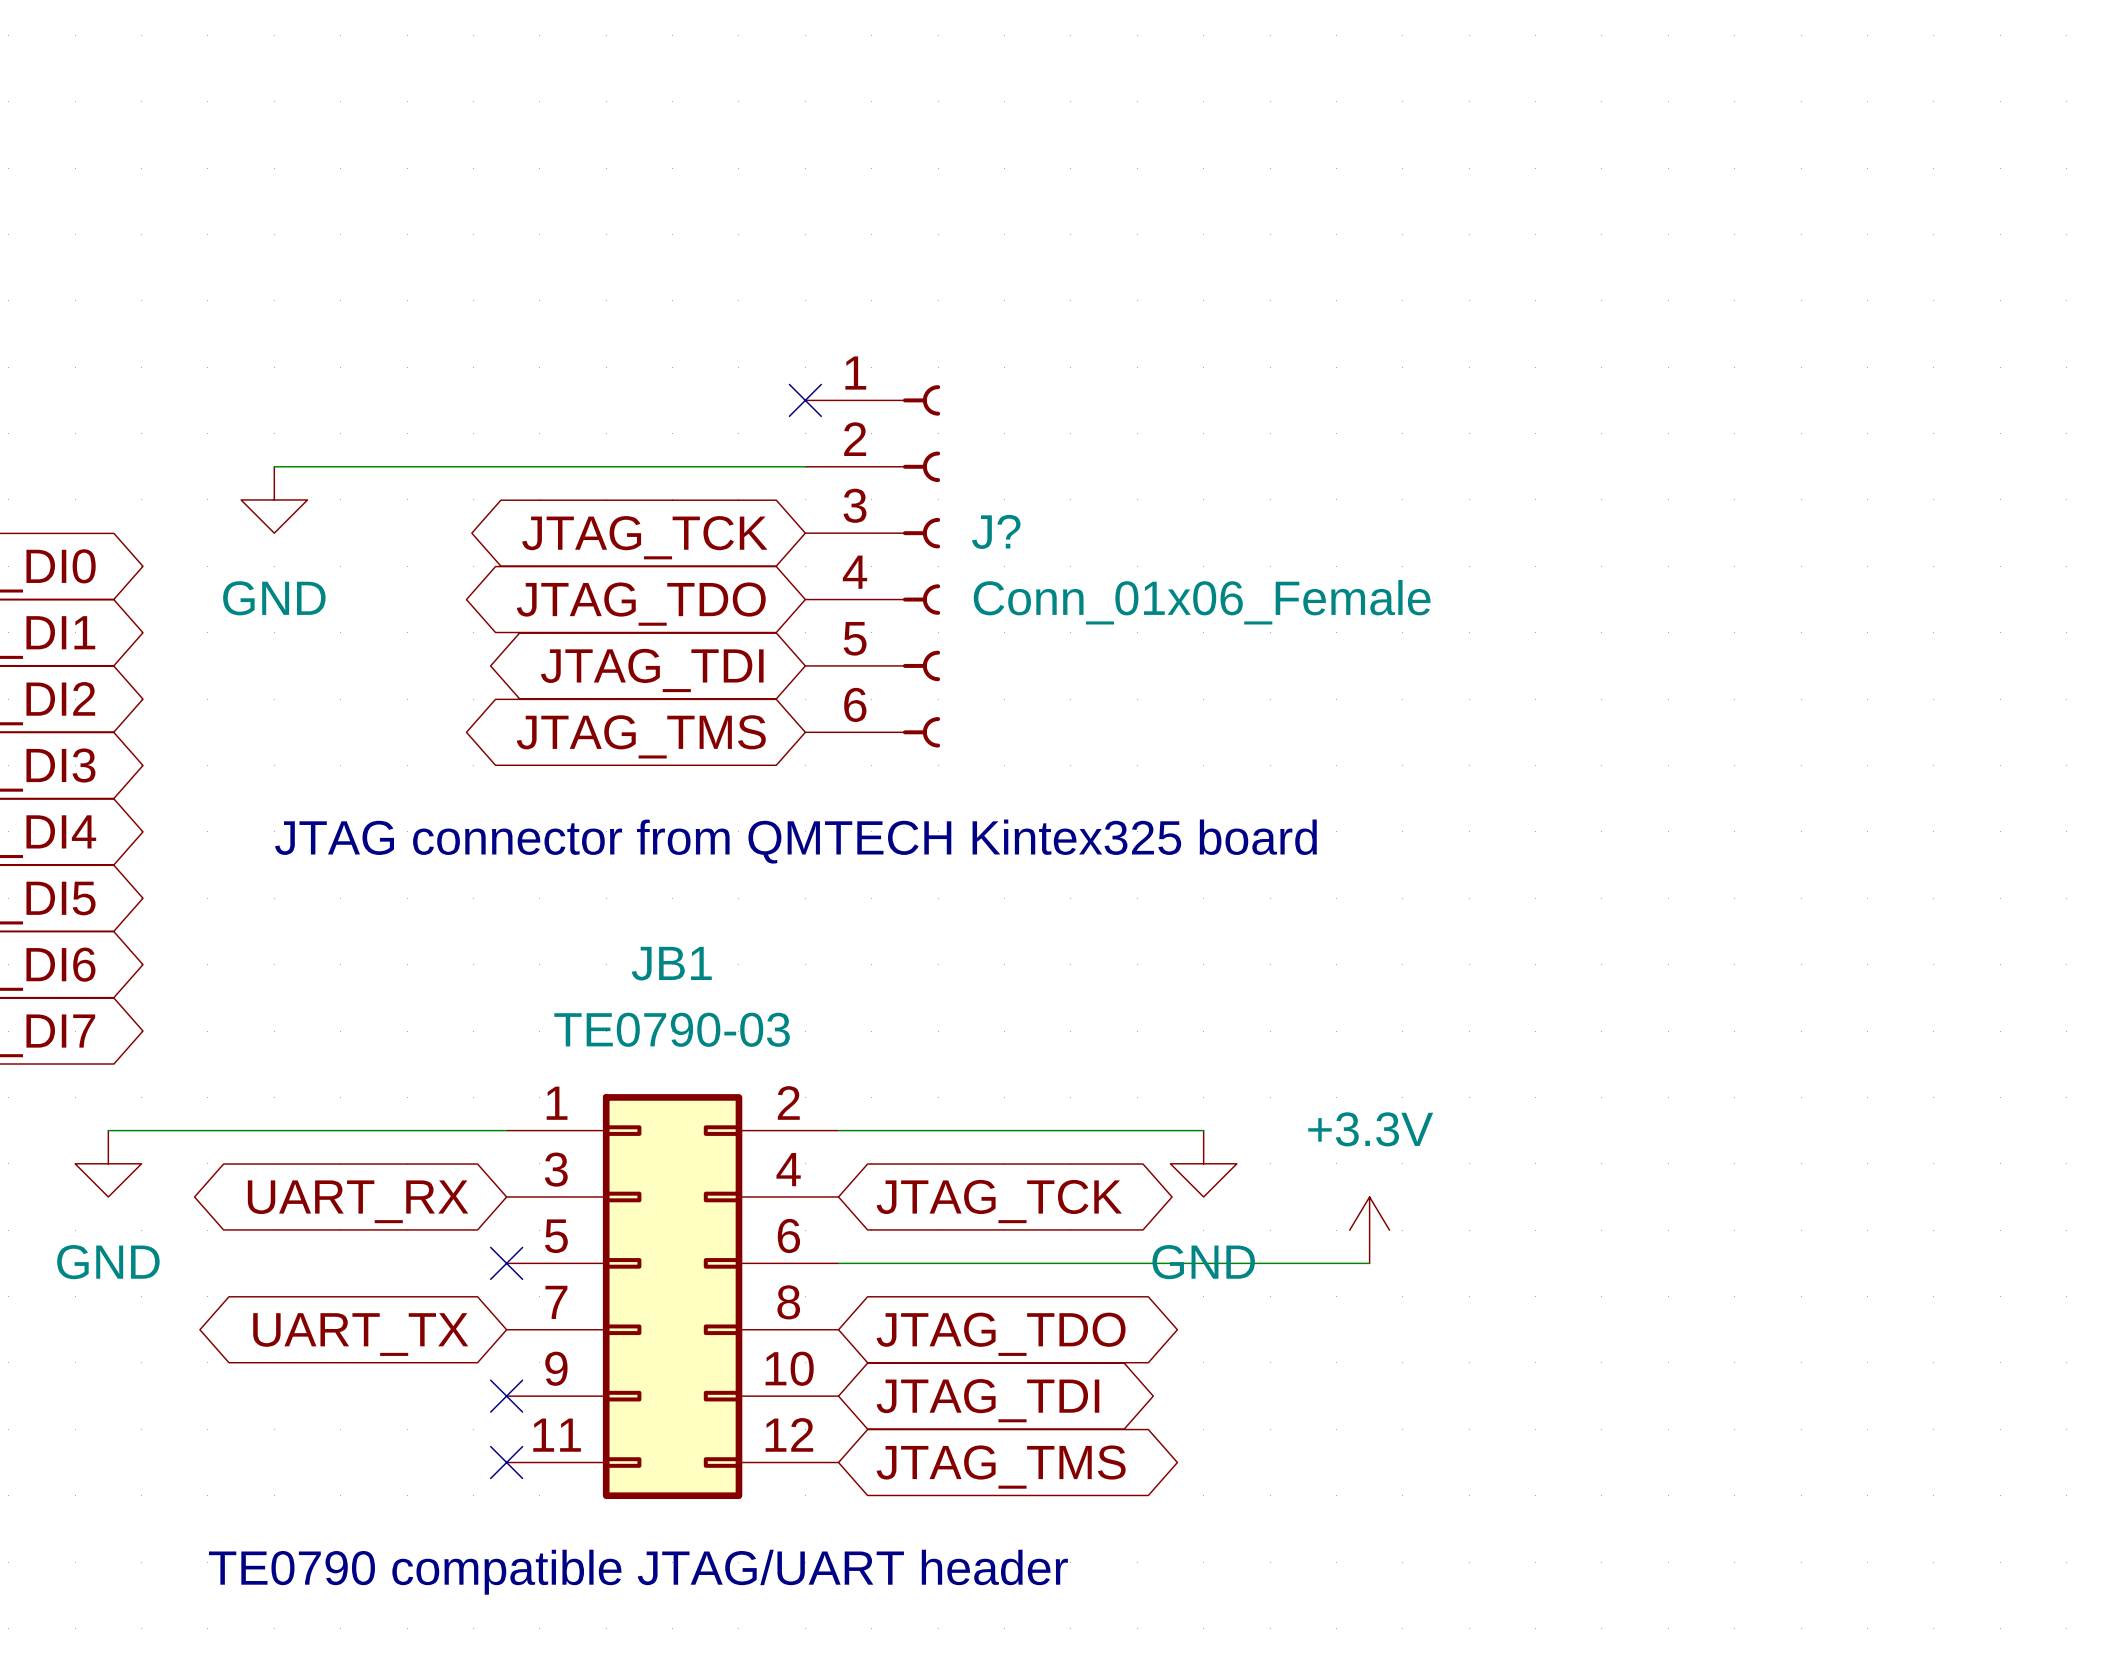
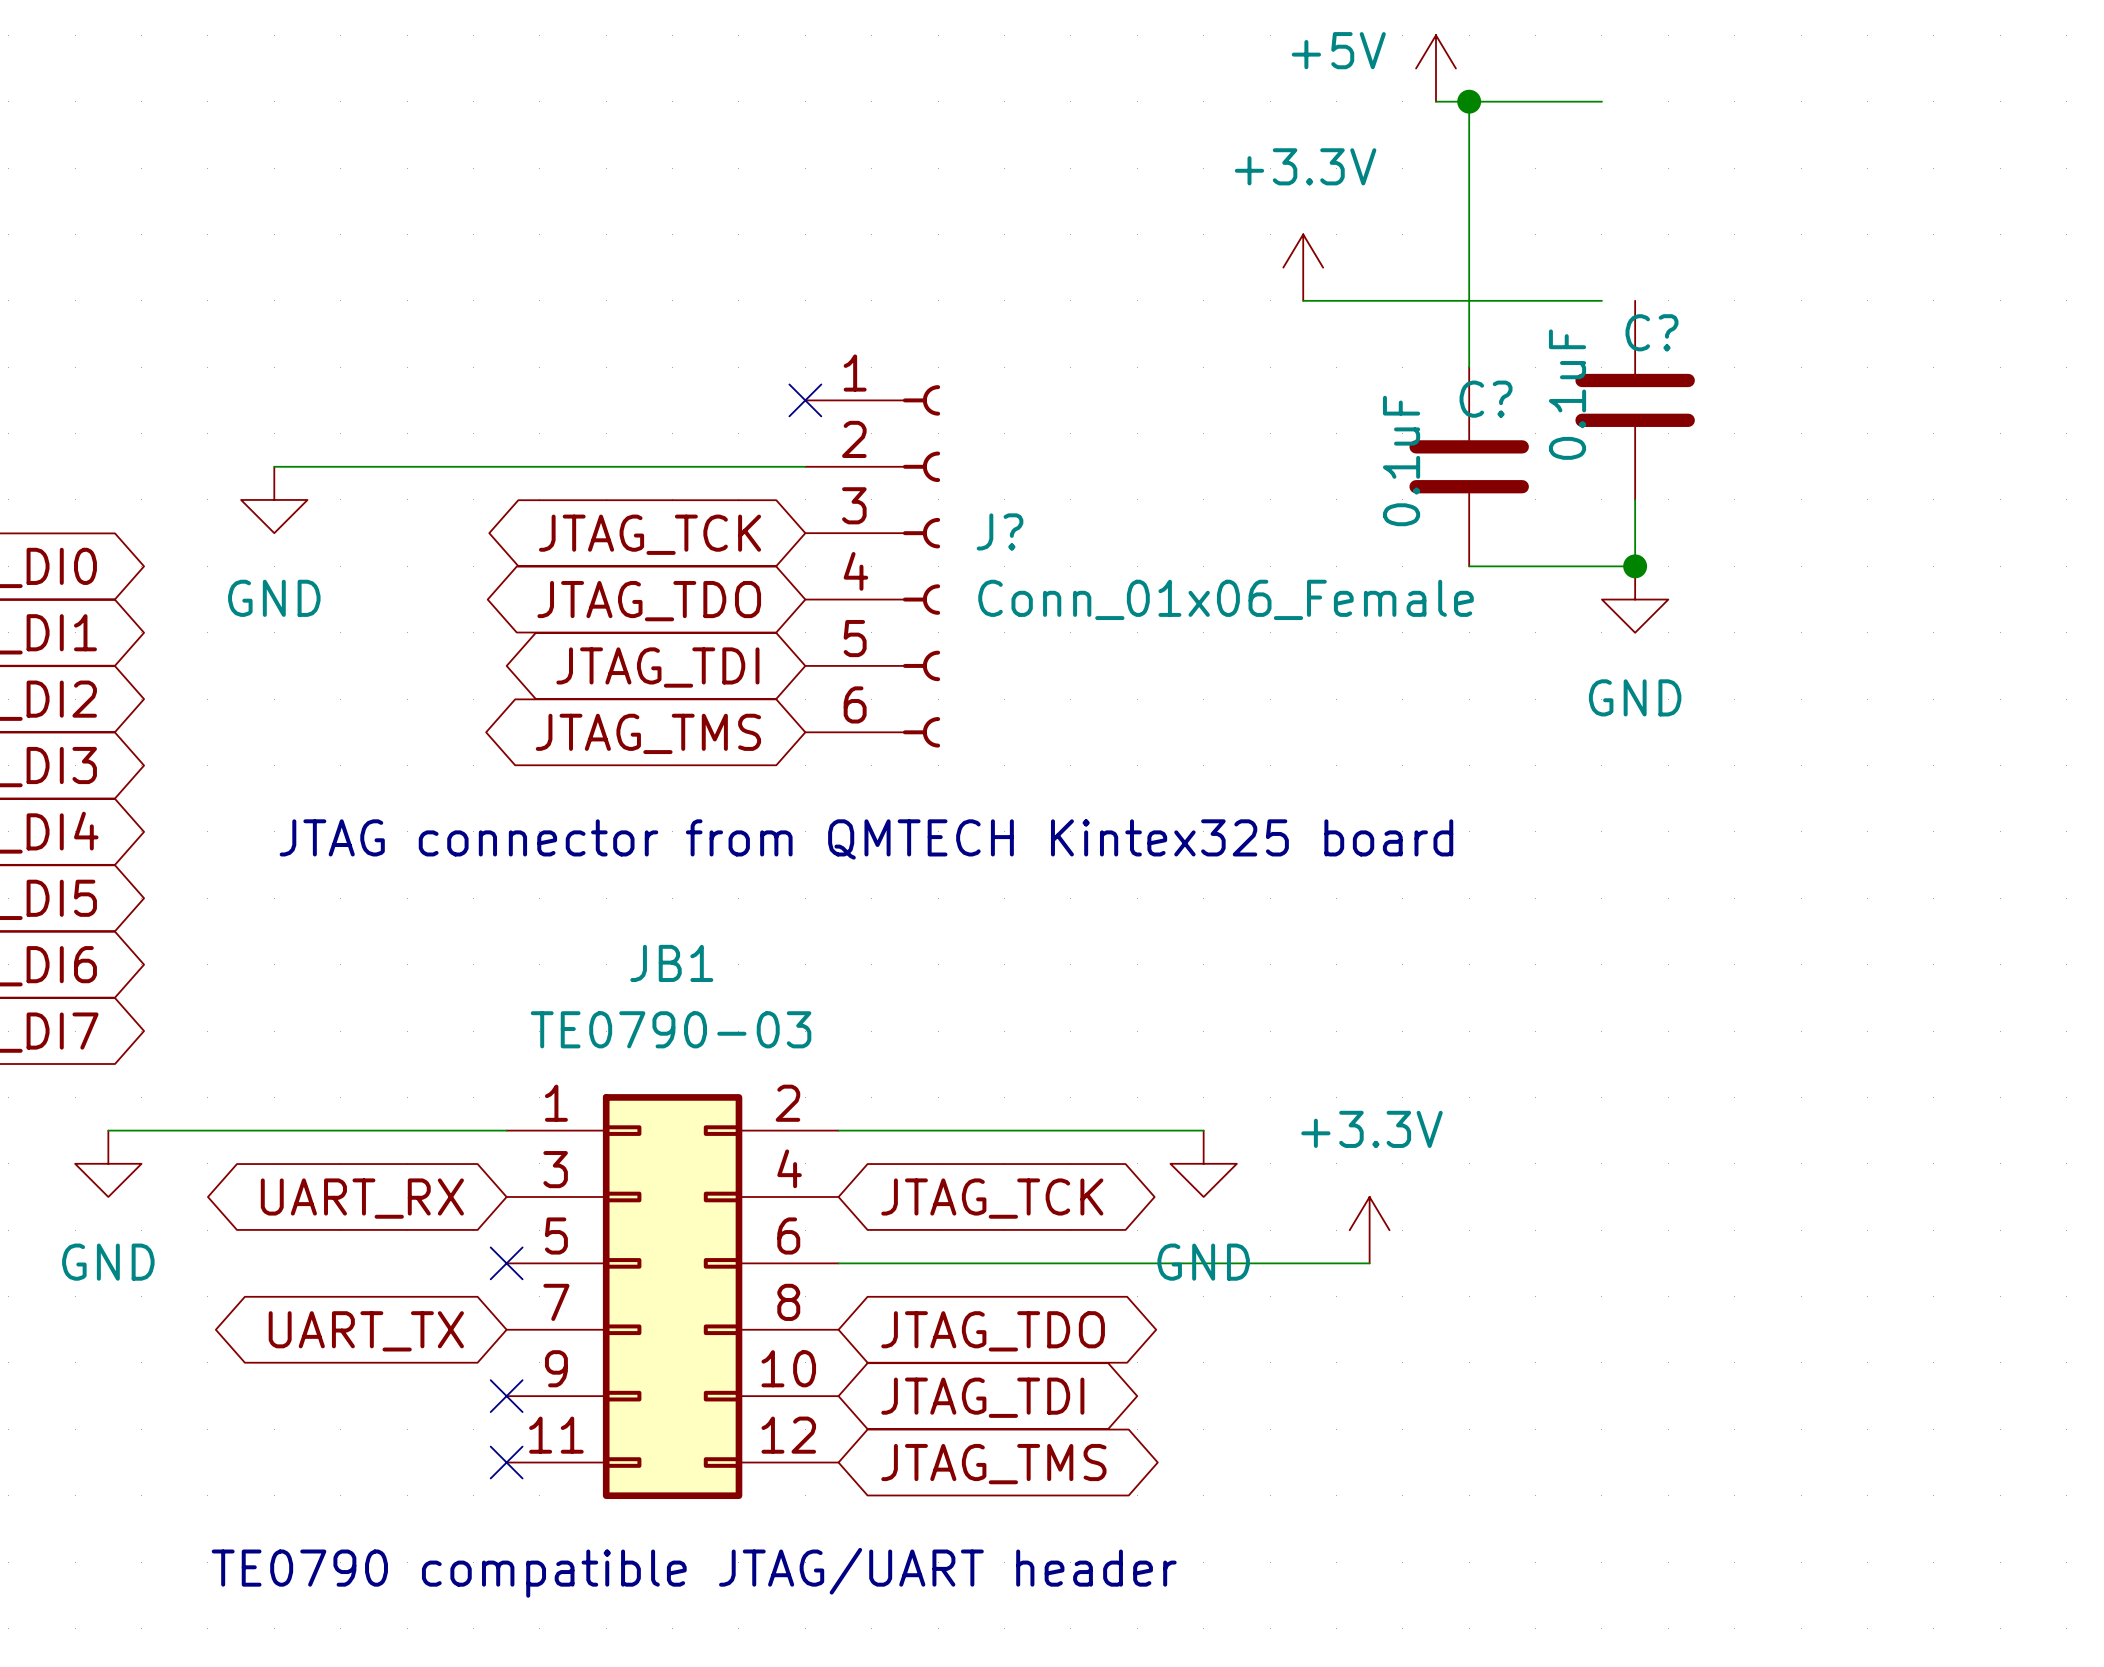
power symbol: none -> +5V (1435, 68)
wire: none -> (1435, 101) (1601, 101)
wire: none -> (1469, 101) (1469, 367)
junction: none -> (1469, 101)
power symbol: none -> +3.3V (1303, 267)
wire: none -> (1303, 300) (1601, 300)
C?: none -> 0.1uF (1635, 400)
C?: none -> 0.1uF (1469, 466)
wire: none -> (1635, 499) (1635, 566) (1469, 566)
junction: none -> (1635, 566)
power symbol: none -> GND (1635, 599)

